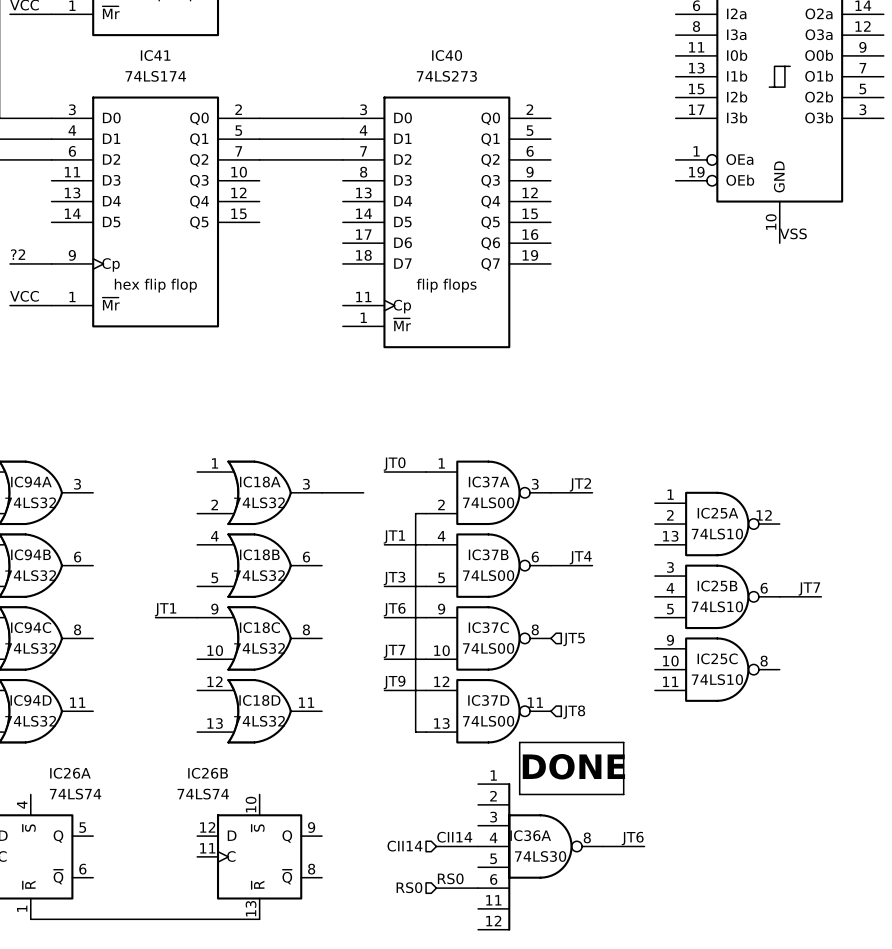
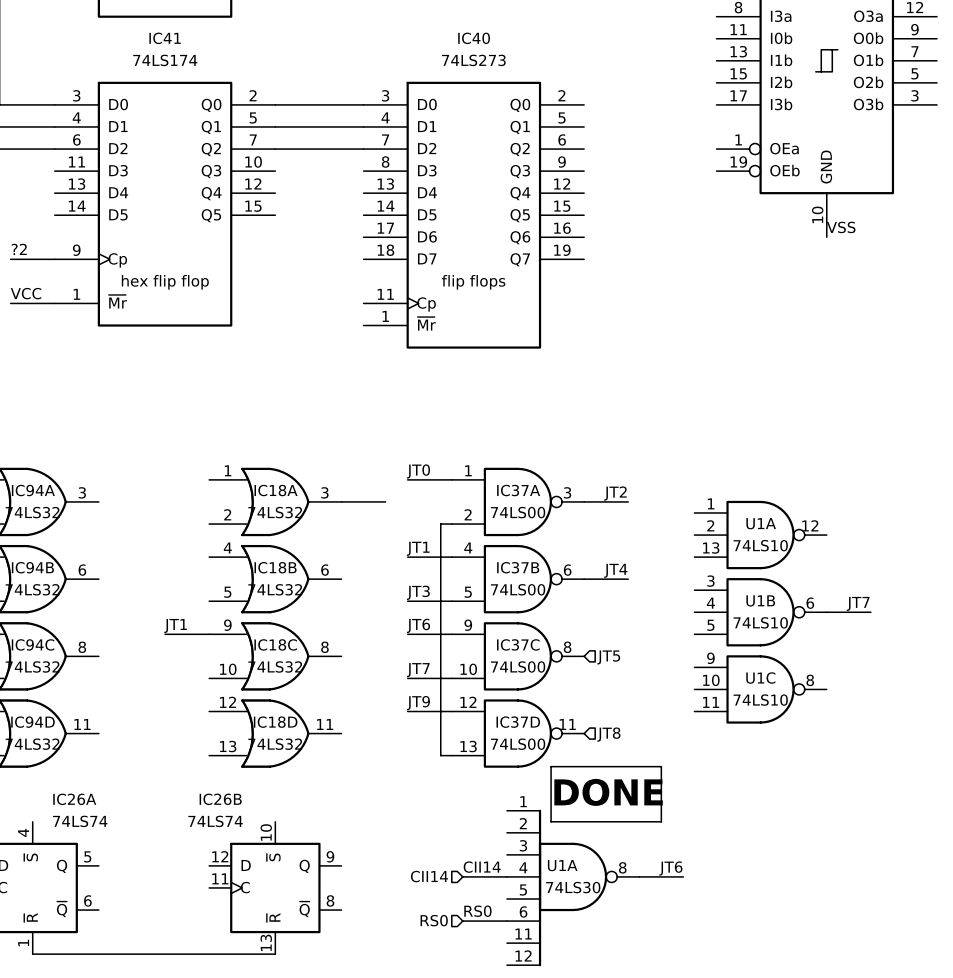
IC25A name: IC25A (717, 513) -> U1A (761, 523)
IC25B name: IC25B (717, 586) -> U1B (760, 600)
IC25C name: IC25C (717, 658) -> U1C (760, 678)
IC36A name: IC36A (530, 835) -> U1A (562, 865)

